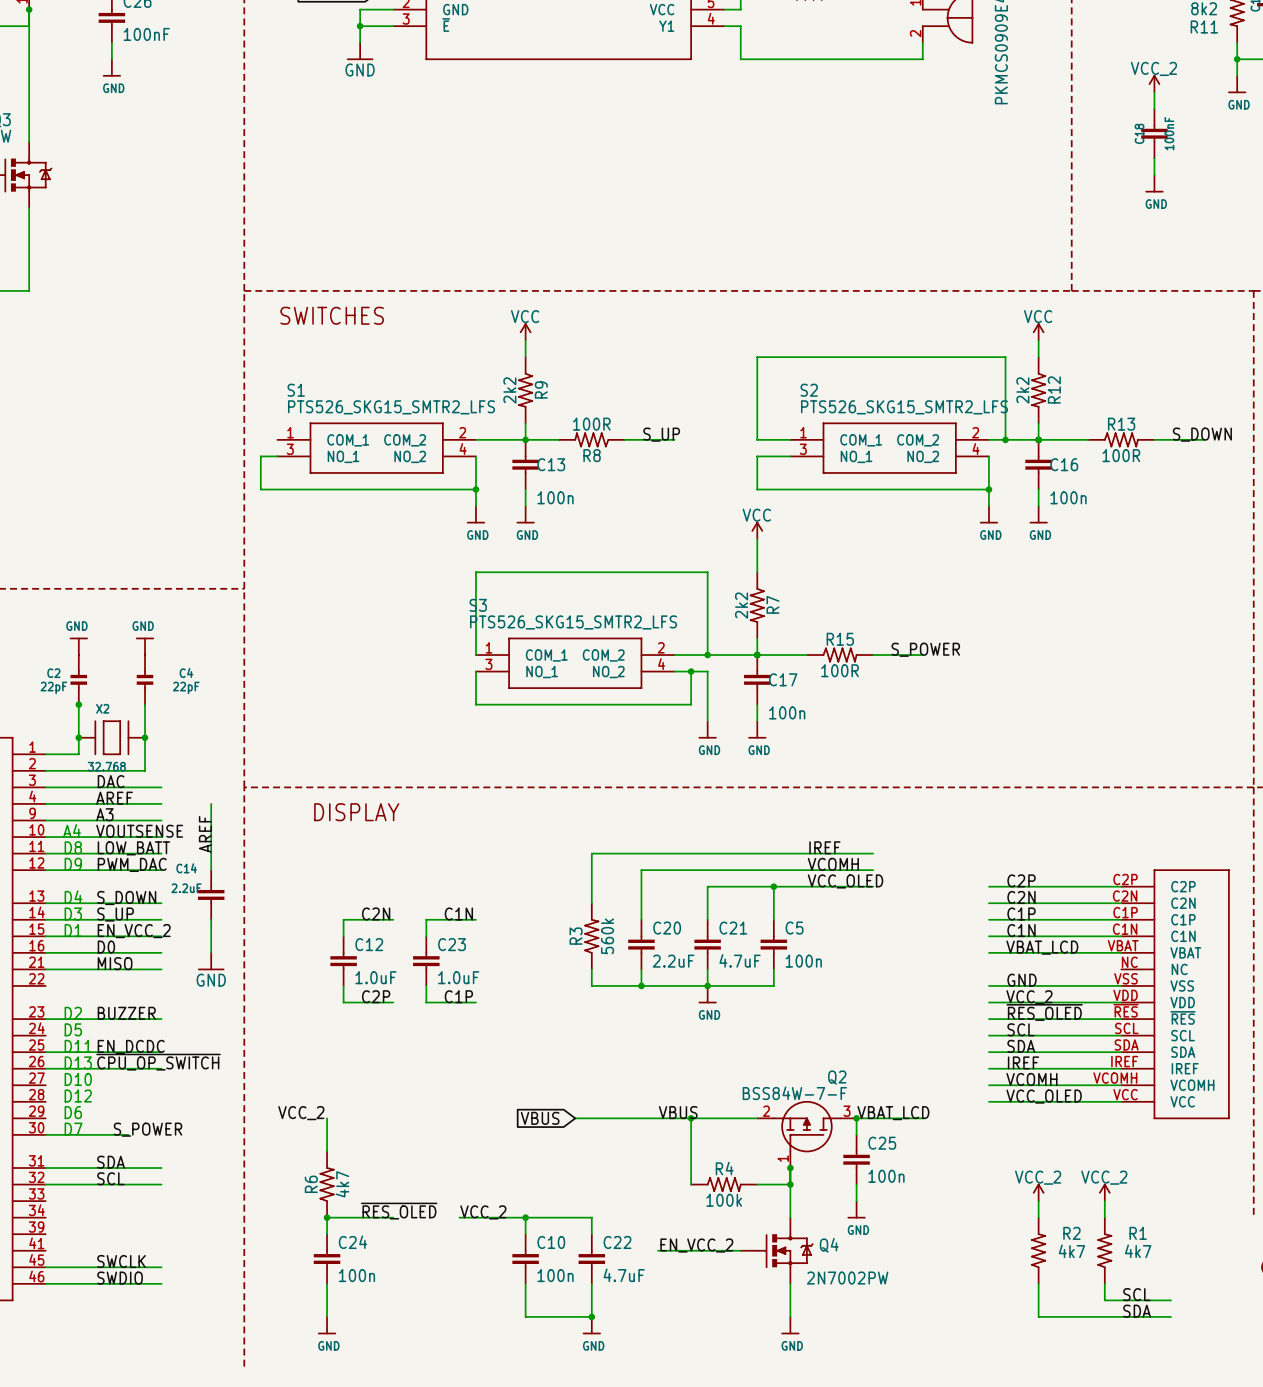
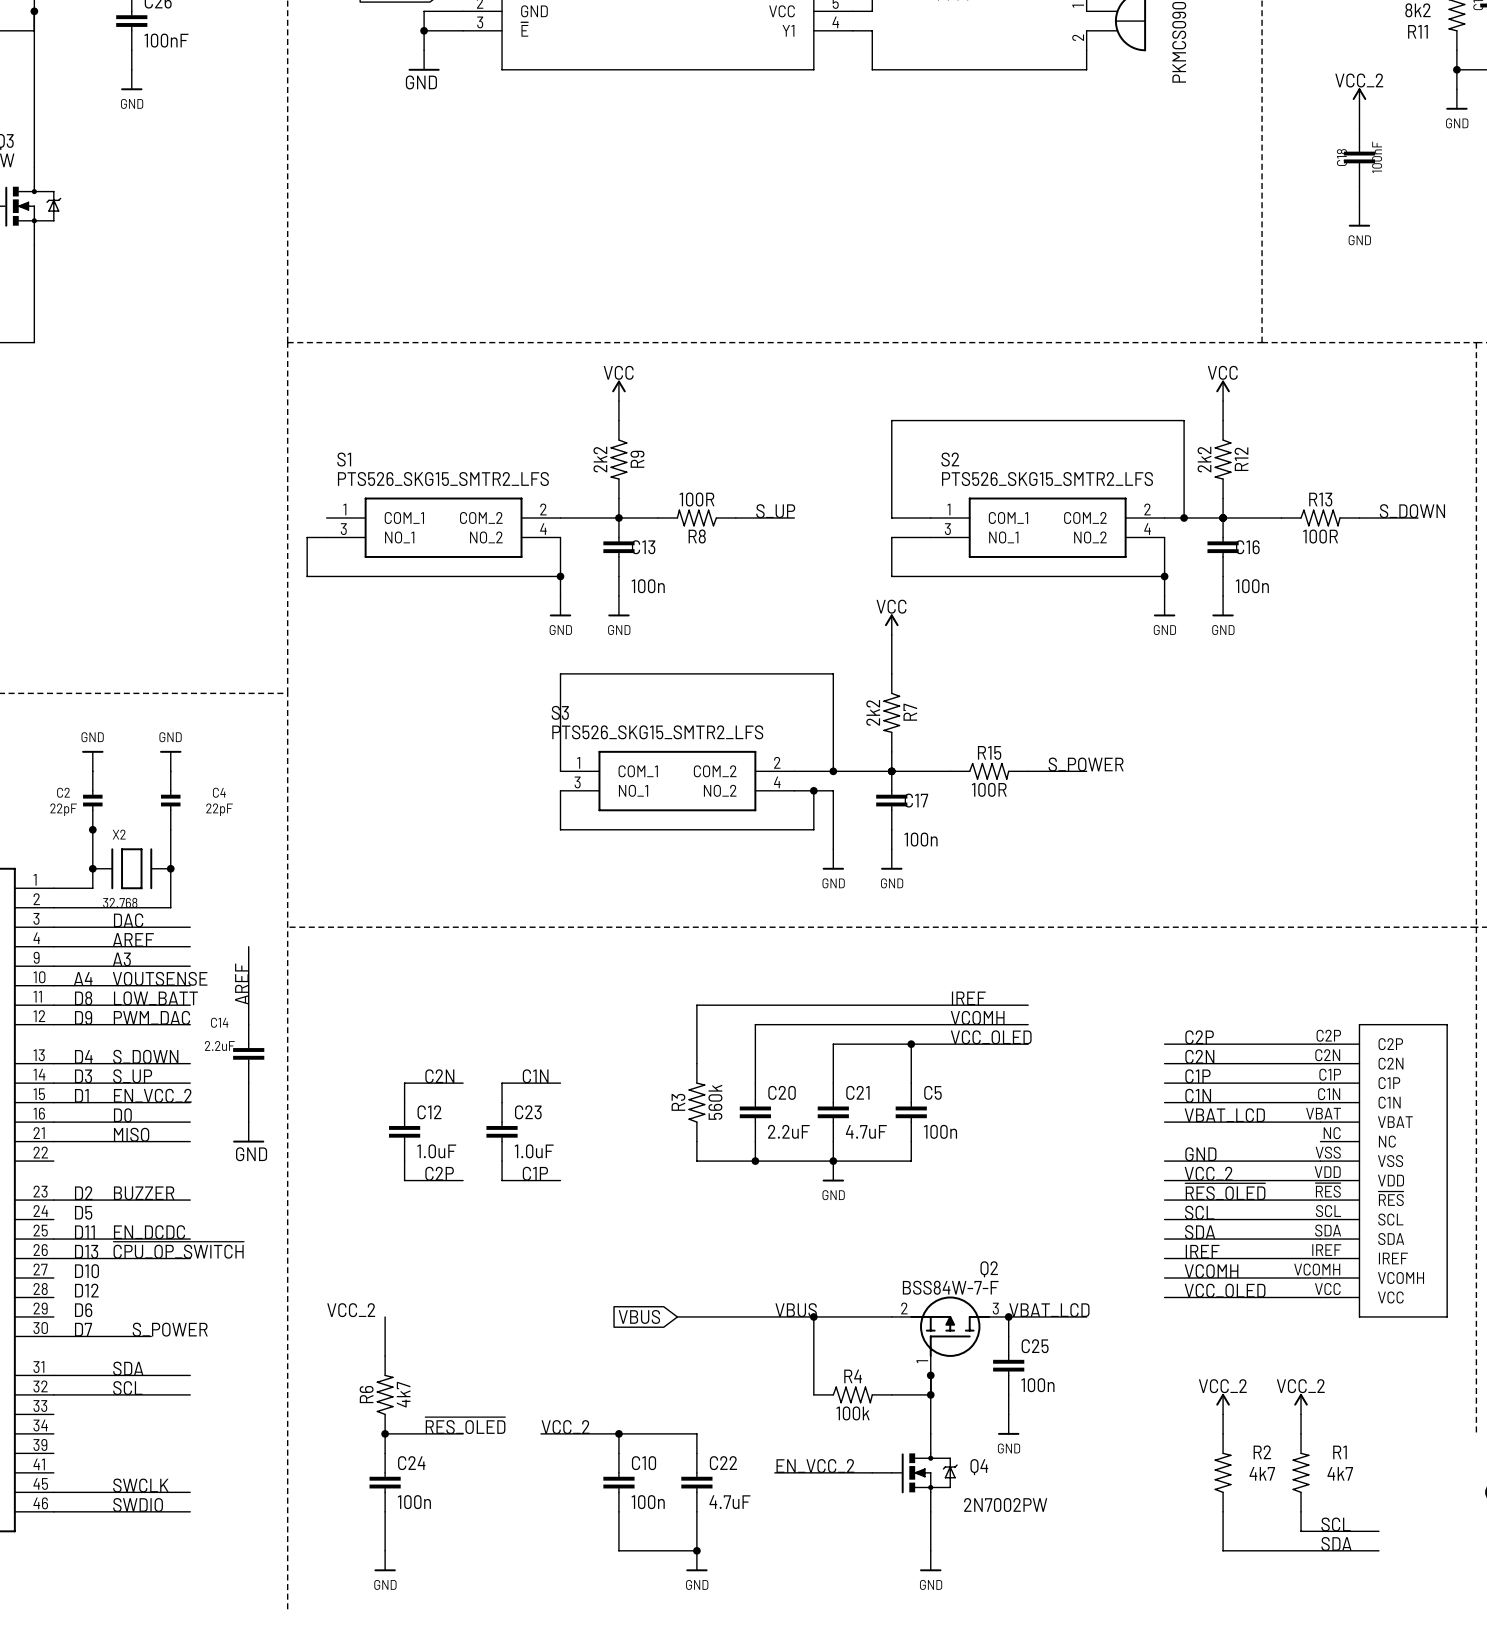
text: SWITCHES (332, 315) -> none
text: DISPLAY (356, 812) -> none

